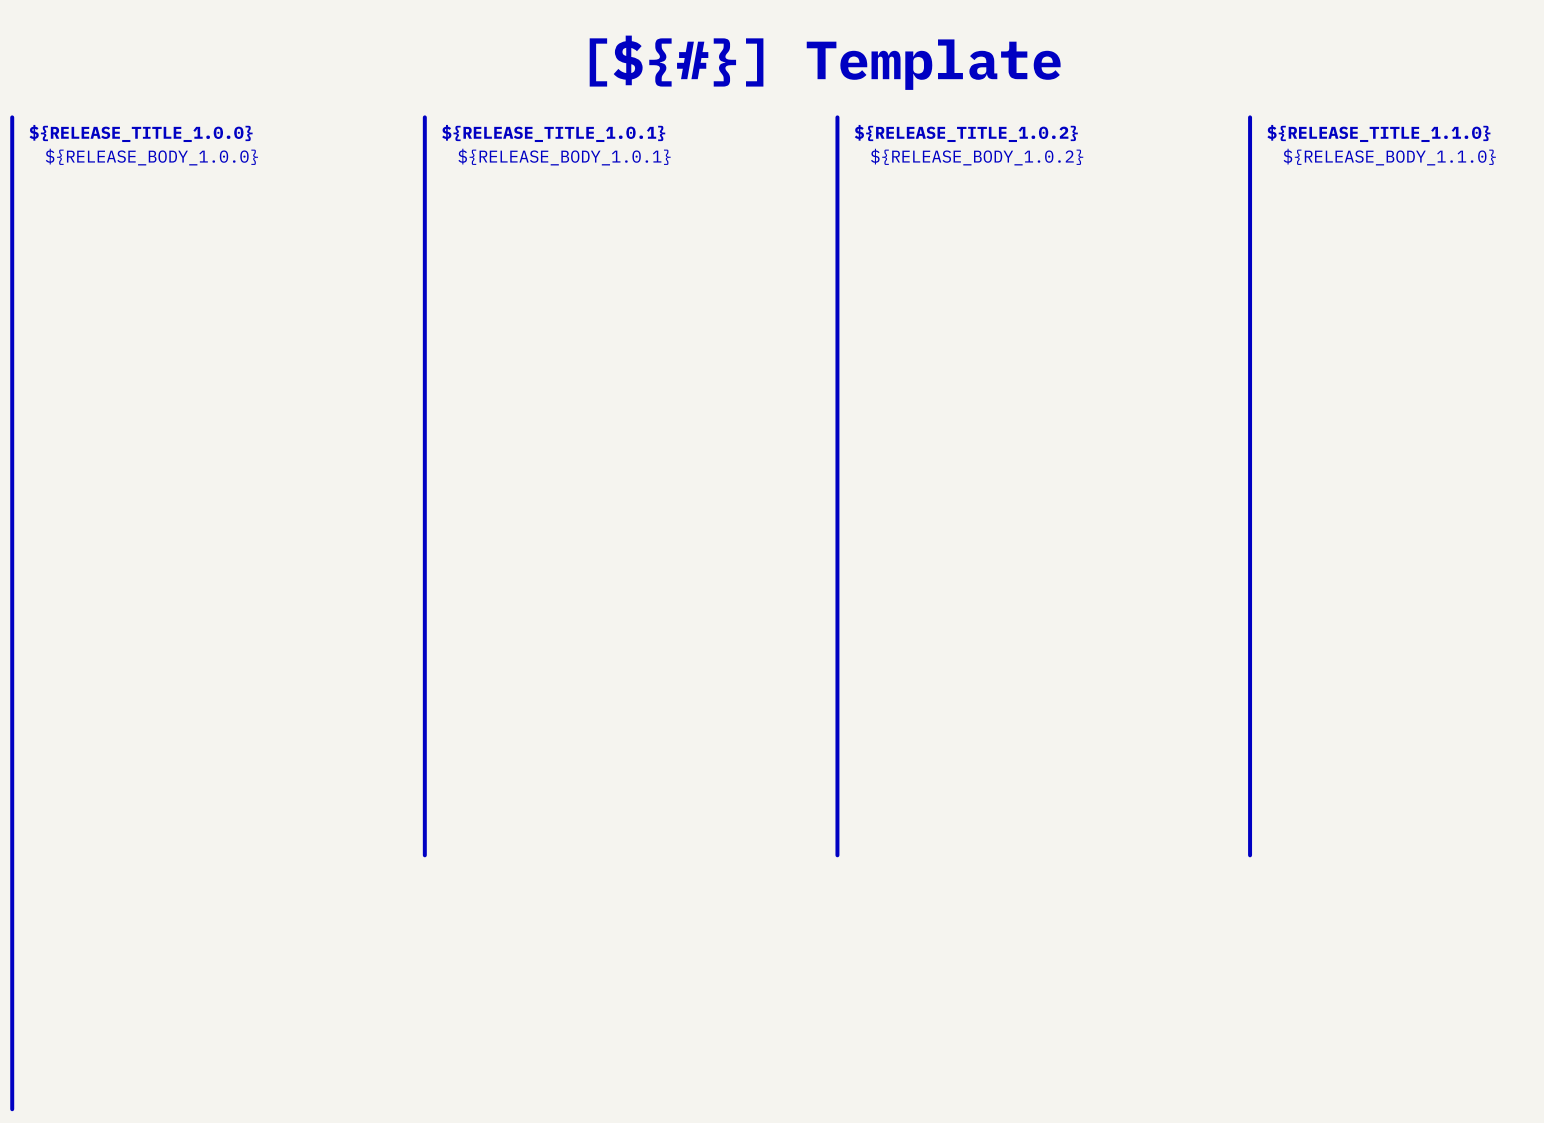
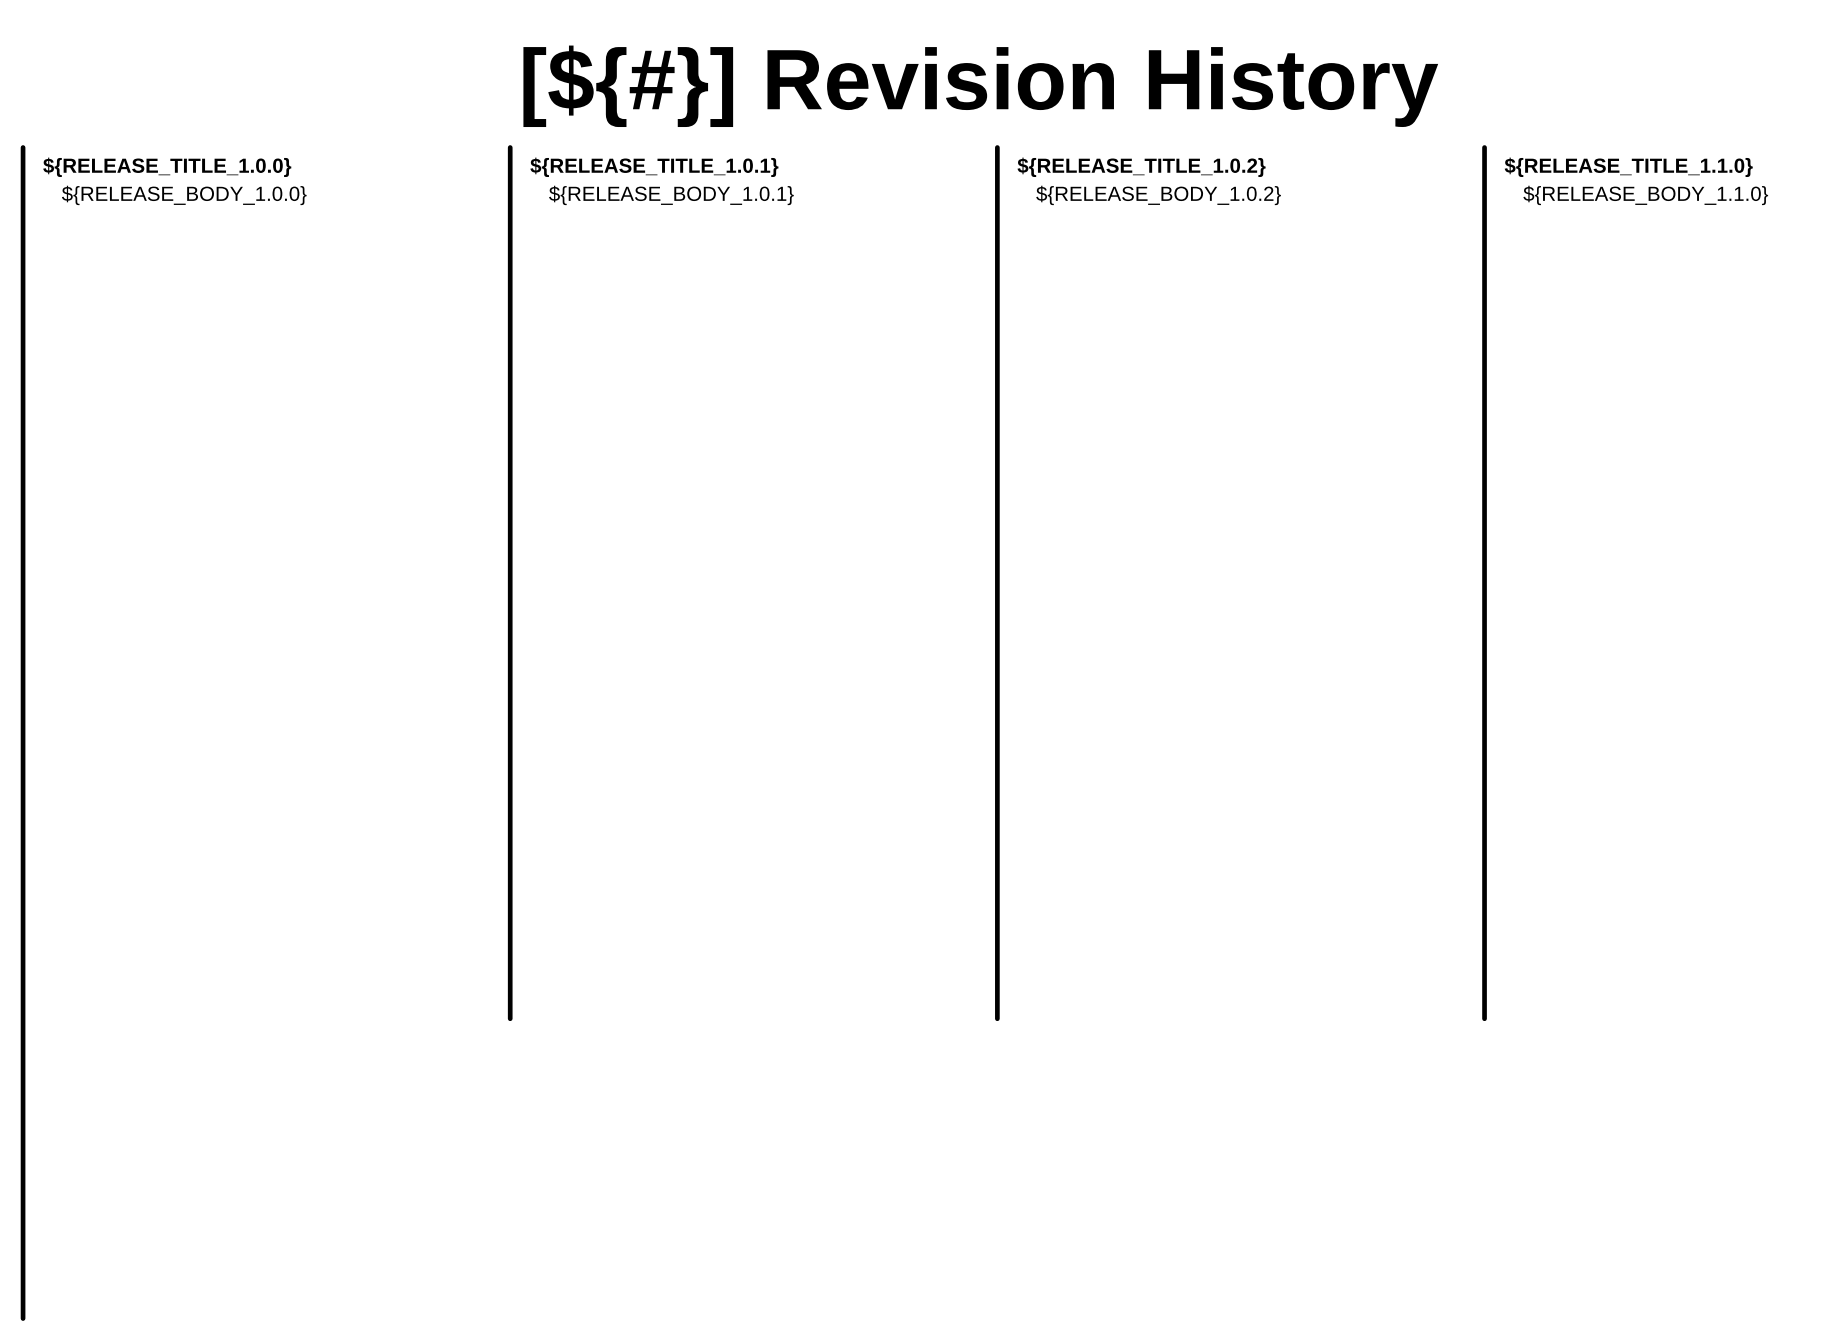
text: [${#}] Template (825, 62) -> [${#}] Revision History (980, 86)

